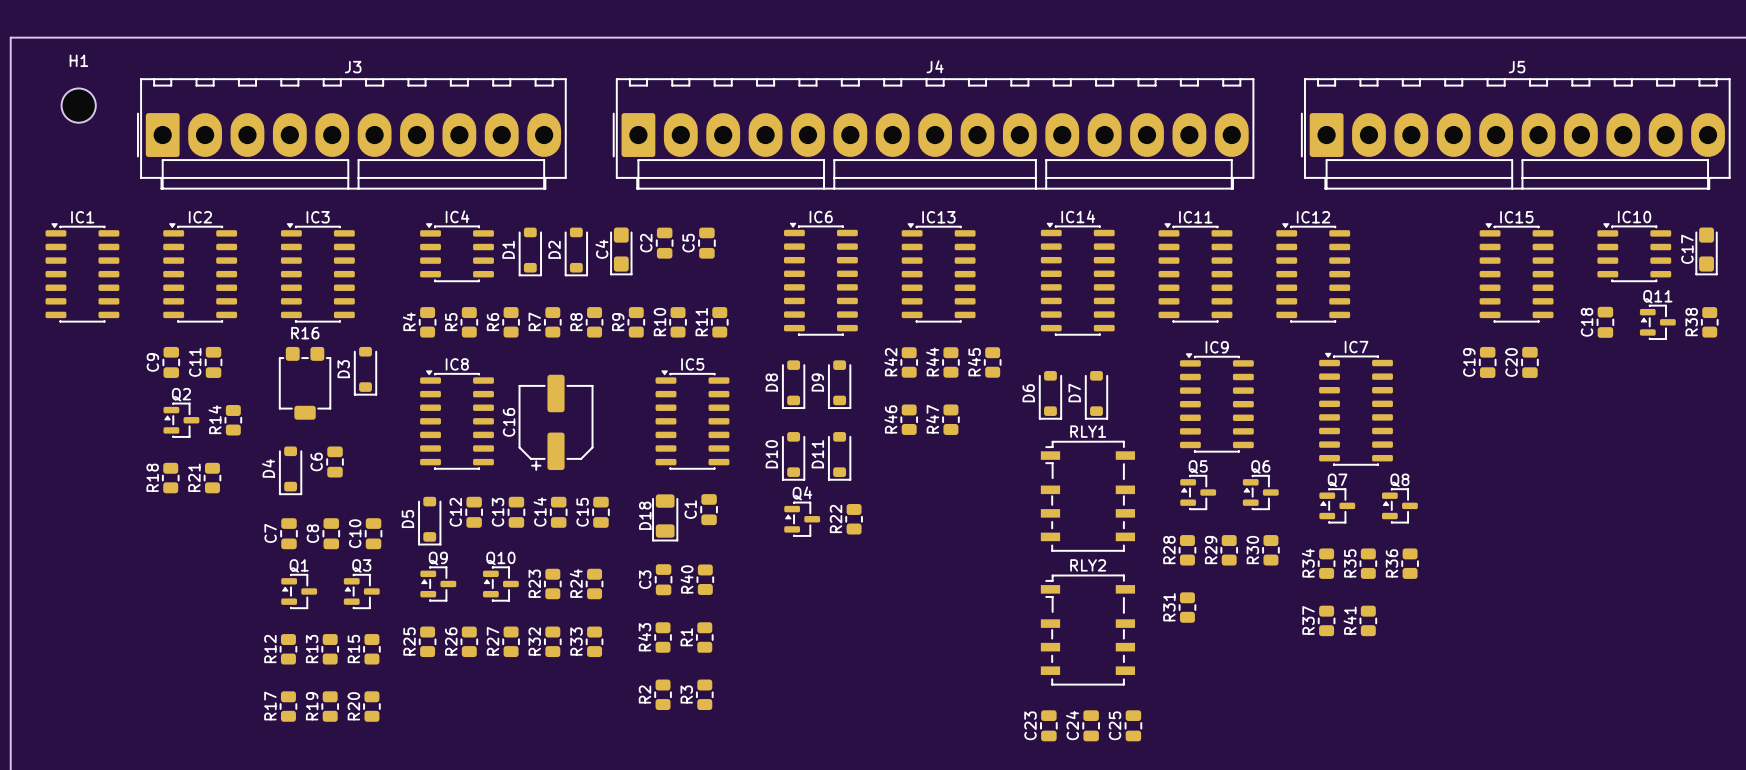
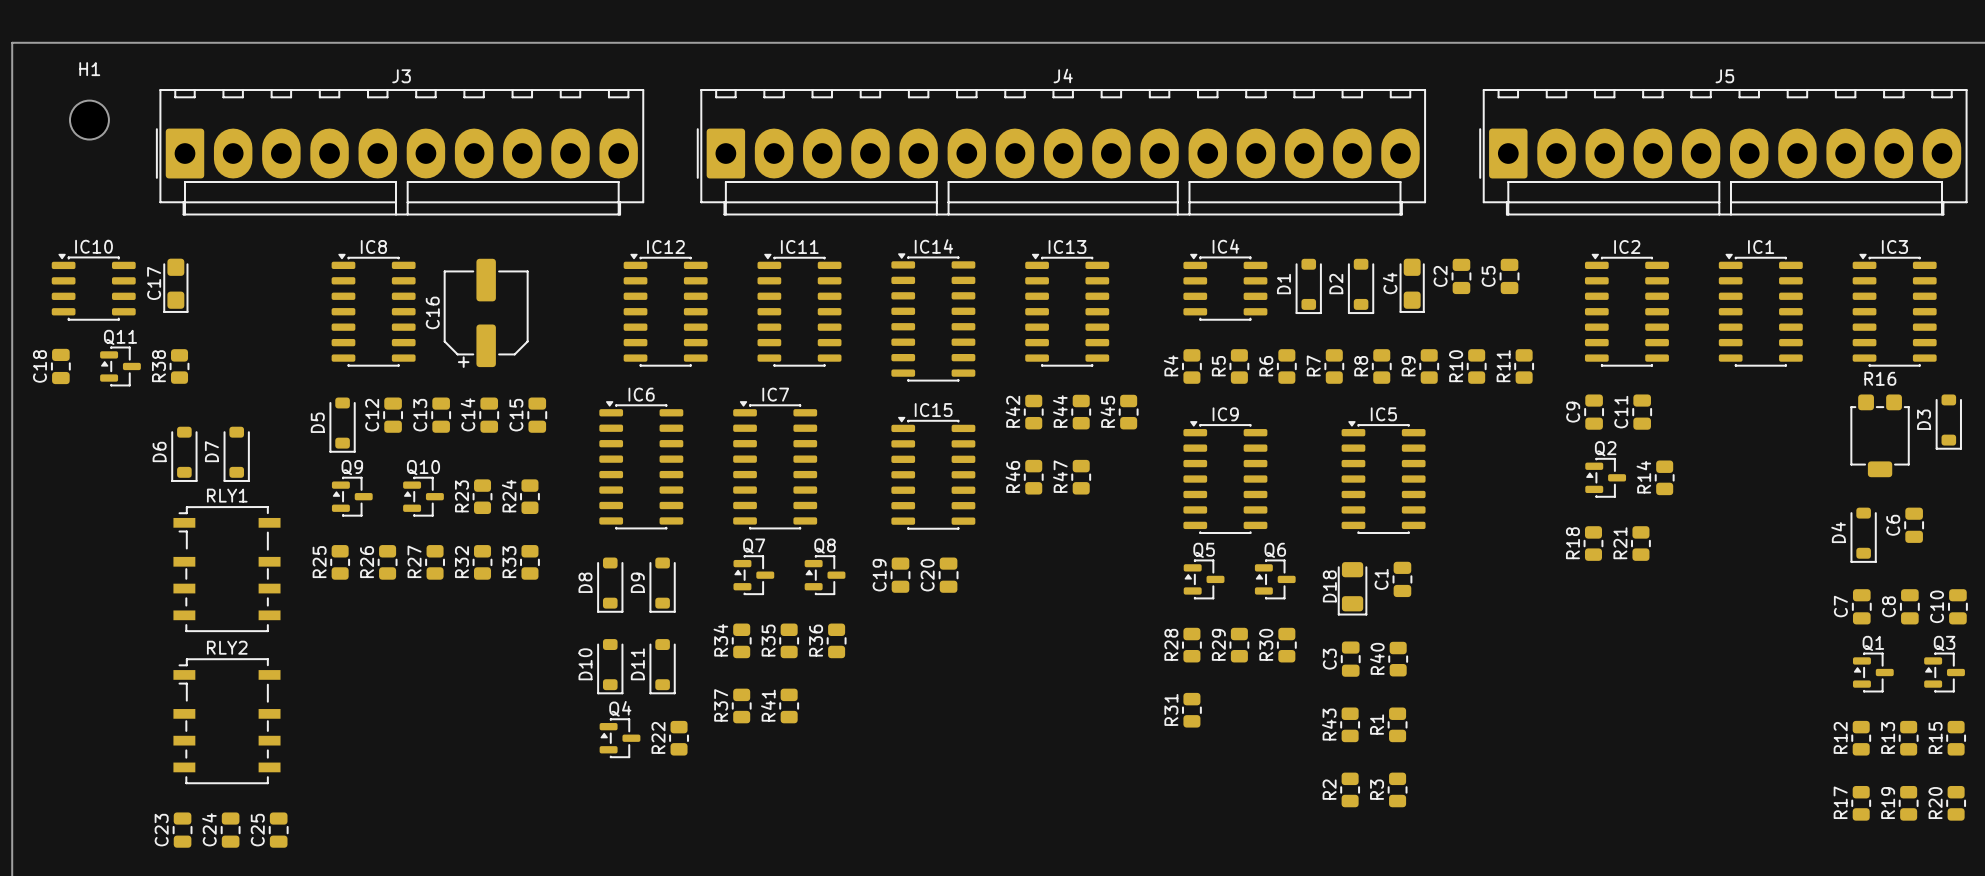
IC6 name: IC6 (821, 217) -> IC14 (933, 246)
C2 position: (664, 243) -> (1461, 276)
C5 position: (706, 243) -> (1509, 276)
D1 position: (530, 251) -> (1308, 286)
D2 position: (576, 251) -> (1361, 286)
C4 position: (621, 251) -> (1412, 285)
C17 position: (1706, 251) -> (175, 285)
IC4 position: (457, 252) -> (1225, 287)
IC10 position: (1634, 252) -> (93, 287)
IC1 position: (82, 272) -> (1760, 310)
IC2 position: (200, 272) -> (1626, 310)
IC3 position: (317, 272) -> (1894, 310)
IC11 position: (1195, 272) -> (799, 310)
IC12 position: (1313, 272) -> (665, 310)
IC15 position: (1516, 272) -> (933, 473)
IC14: (1077, 279) -> none
R4 position: (427, 322) -> (1191, 366)
R5 position: (469, 322) -> (1239, 366)
R6 position: (511, 322) -> (1286, 366)
R7 position: (552, 322) -> (1334, 366)
R8 position: (594, 322) -> (1381, 366)
R9 position: (636, 322) -> (1429, 366)
R10 position: (678, 322) -> (1476, 366)
R11 position: (719, 322) -> (1524, 366)
C18 position: (1605, 322) -> (60, 366)
Q11 position: (1657, 322) -> (120, 366)
R38 position: (1709, 322) -> (179, 366)
C9 position: (171, 362) -> (1594, 412)
C11 position: (213, 362) -> (1642, 412)
C19 position: (1487, 362) -> (900, 575)
C20 position: (1529, 362) -> (948, 575)
D3 position: (365, 371) -> (1948, 421)
R16 position: (305, 383) -> (1880, 435)
D8 position: (793, 384) -> (610, 585)
D9 position: (839, 384) -> (662, 585)
D6 position: (1050, 395) -> (184, 454)
D7 position: (1096, 395) -> (236, 454)
IC9 position: (1216, 402) -> (1225, 477)
IC6: none -> (641, 465)
IC7 position: (1356, 409) -> (775, 465)
IC8 position: (457, 419) -> (373, 310)
IC5 position: (692, 419) -> (1383, 477)
Q2 position: (181, 420) -> (1605, 477)
R14 position: (233, 420) -> (1664, 477)
C16 position: (556, 422) -> (486, 313)
D10 position: (793, 456) -> (610, 666)
D11 position: (839, 456) -> (662, 666)
C6 position: (335, 461) -> (1914, 525)
D4 position: (290, 470) -> (1863, 535)
R18 position: (170, 478) -> (1593, 543)
R21 position: (212, 478) -> (1640, 543)
Q5 position: (1198, 492) -> (1204, 579)
Q6 position: (1260, 492) -> (1275, 579)
RLY1 position: (1087, 496) -> (226, 569)
Q7 position: (1337, 505) -> (753, 575)
Q8 position: (1399, 505) -> (825, 575)
C1 position: (709, 509) -> (1402, 579)
C12 position: (474, 512) -> (393, 415)
C13 position: (516, 512) -> (441, 415)
C14 position: (558, 512) -> (489, 415)
C15 position: (600, 512) -> (537, 415)
D18 position: (665, 517) -> (1352, 588)
Q4 position: (802, 519) -> (620, 738)
R22 position: (854, 519) -> (679, 738)
D5 position: (429, 520) -> (342, 425)
C7 position: (288, 533) -> (1861, 606)
C8 position: (331, 533) -> (1909, 606)
C10 position: (373, 533) -> (1957, 606)
R28 position: (1187, 550) -> (1191, 645)
R29 position: (1229, 550) -> (1239, 645)
R30 position: (1270, 550) -> (1286, 645)
R34 position: (1326, 563) -> (741, 640)
R35 position: (1368, 563) -> (789, 640)
R36 position: (1410, 563) -> (836, 640)
C3 position: (663, 579) -> (1350, 659)
R40 position: (705, 579) -> (1398, 659)
Q9 position: (438, 584) -> (352, 496)
Q10 position: (500, 584) -> (423, 496)
R23 position: (552, 584) -> (482, 496)
R24 position: (594, 584) -> (529, 496)
Q1 position: (299, 591) -> (1873, 672)
Q3 position: (361, 591) -> (1944, 672)
R31 position: (1187, 607) -> (1191, 710)
R37 position: (1326, 620) -> (741, 705)
R41 position: (1368, 620) -> (789, 705)
RLY2 position: (1087, 630) -> (226, 721)
R43 position: (663, 637) -> (1350, 724)
R1 position: (704, 637) -> (1397, 724)
R25 position: (427, 641) -> (340, 562)
R26 position: (469, 641) -> (387, 562)
R27 position: (511, 641) -> (435, 562)
R32 position: (552, 641) -> (482, 562)
R33 position: (594, 641) -> (529, 562)
R12 position: (288, 649) -> (1861, 738)
R13 position: (330, 649) -> (1908, 738)
R15 position: (371, 649) -> (1956, 738)
R2 position: (663, 694) -> (1350, 789)
R3 position: (704, 694) -> (1397, 789)
R17 position: (288, 706) -> (1861, 803)
R19 position: (330, 706) -> (1908, 803)
R20 position: (371, 706) -> (1956, 803)
C23 position: (1048, 725) -> (182, 830)
C24 position: (1091, 725) -> (230, 830)
C25 position: (1133, 725) -> (278, 830)

